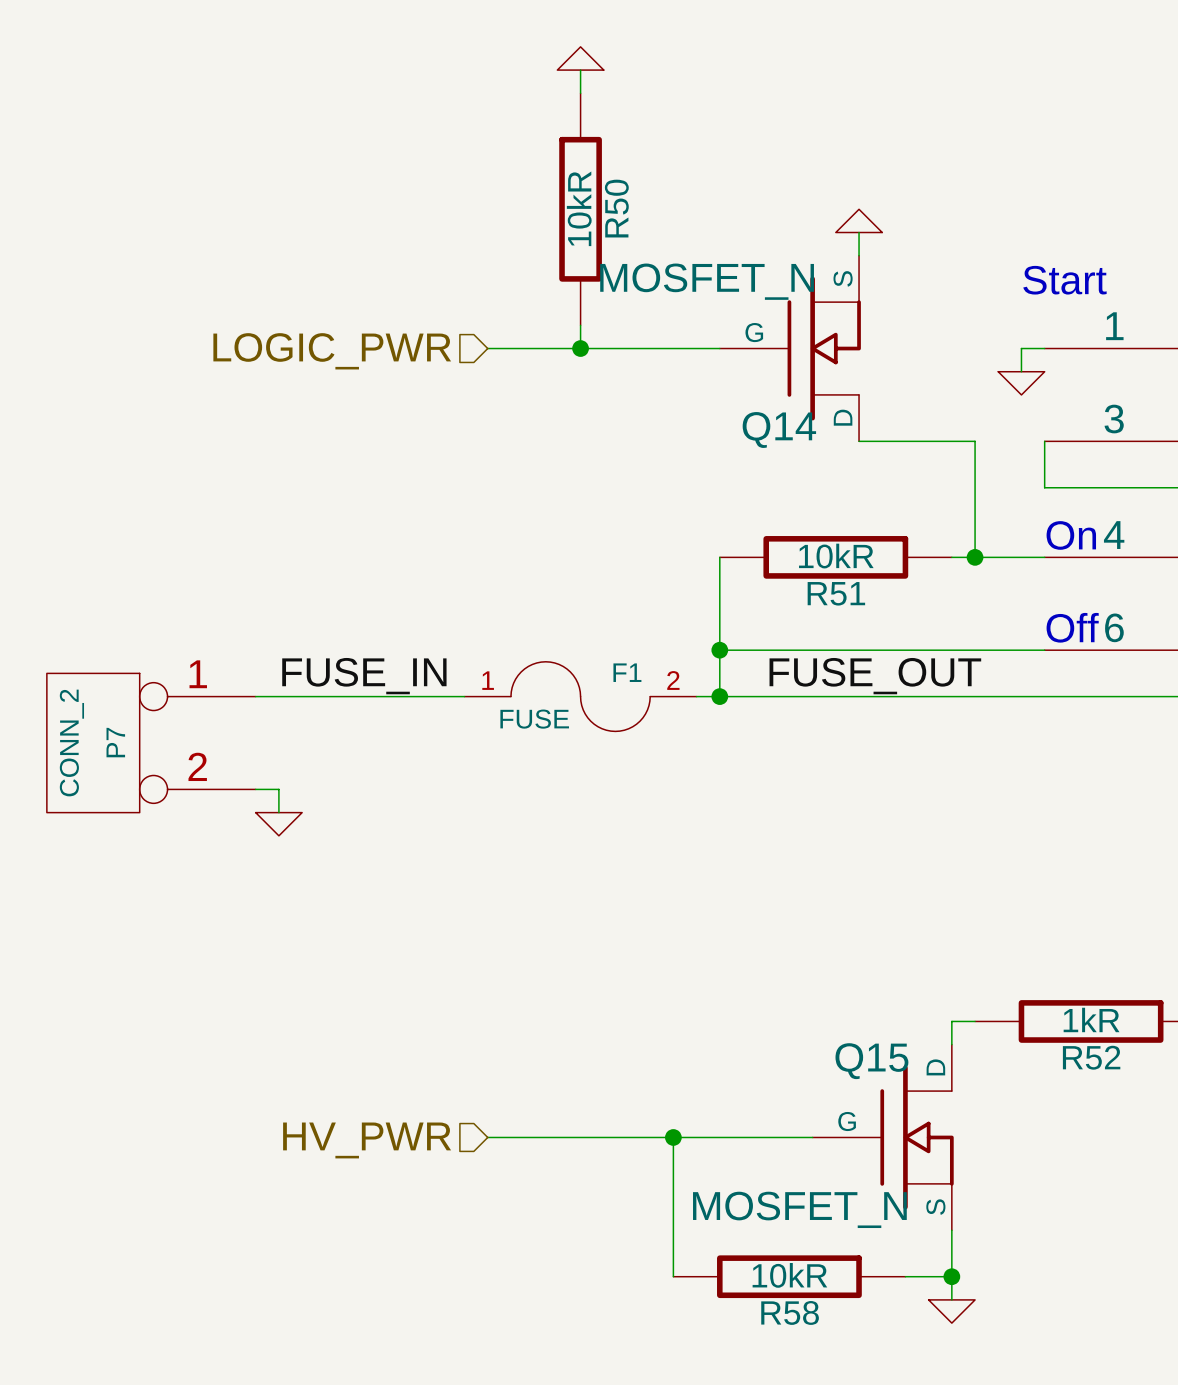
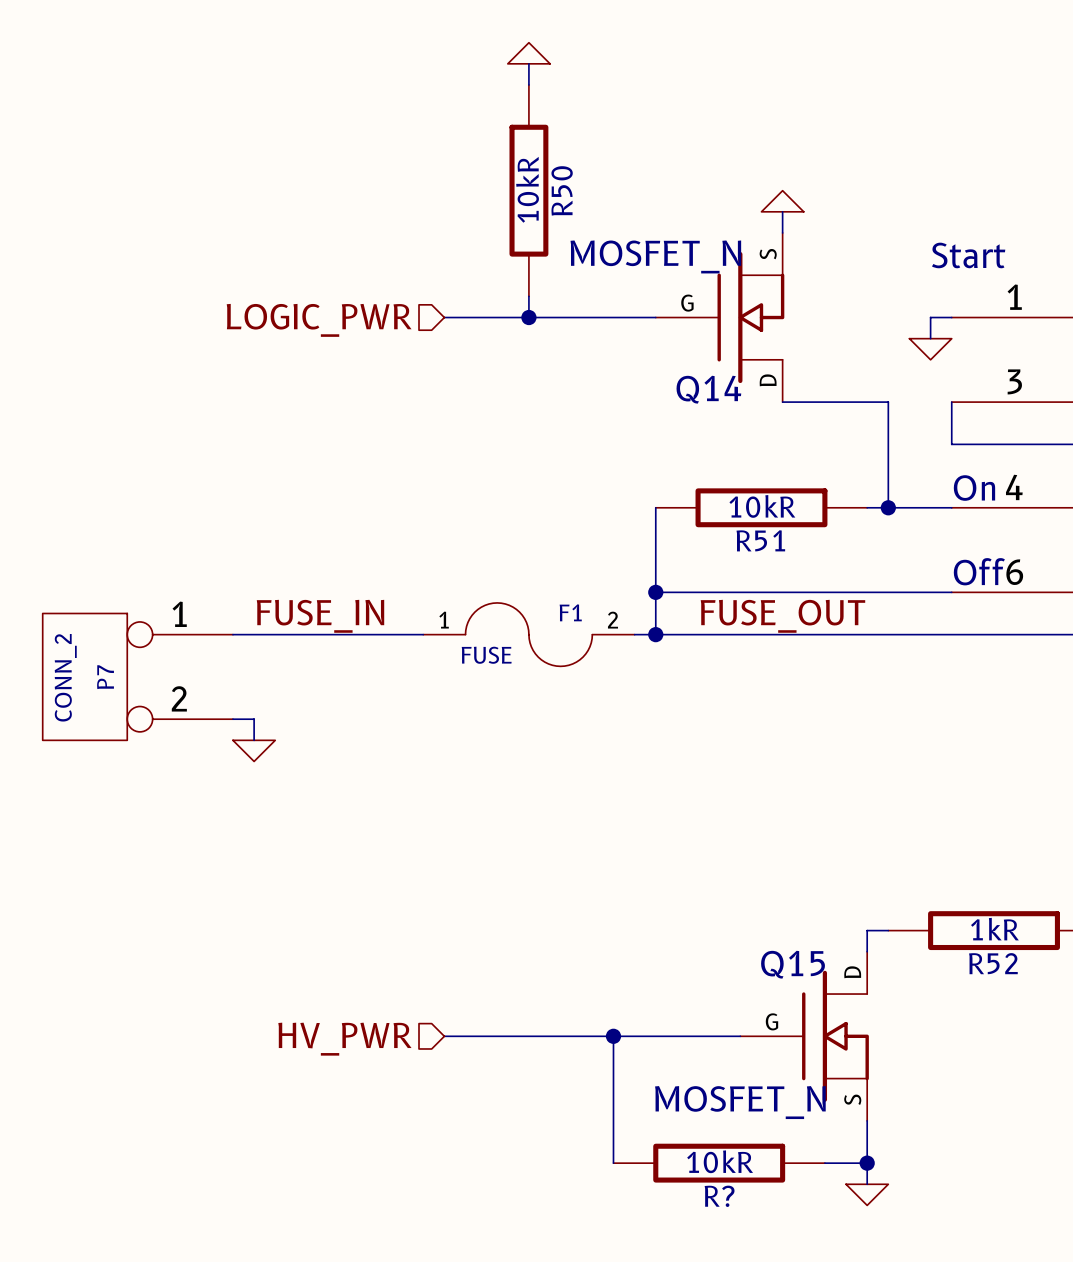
R58 name: R58 (790, 1312) -> R? (719, 1196)

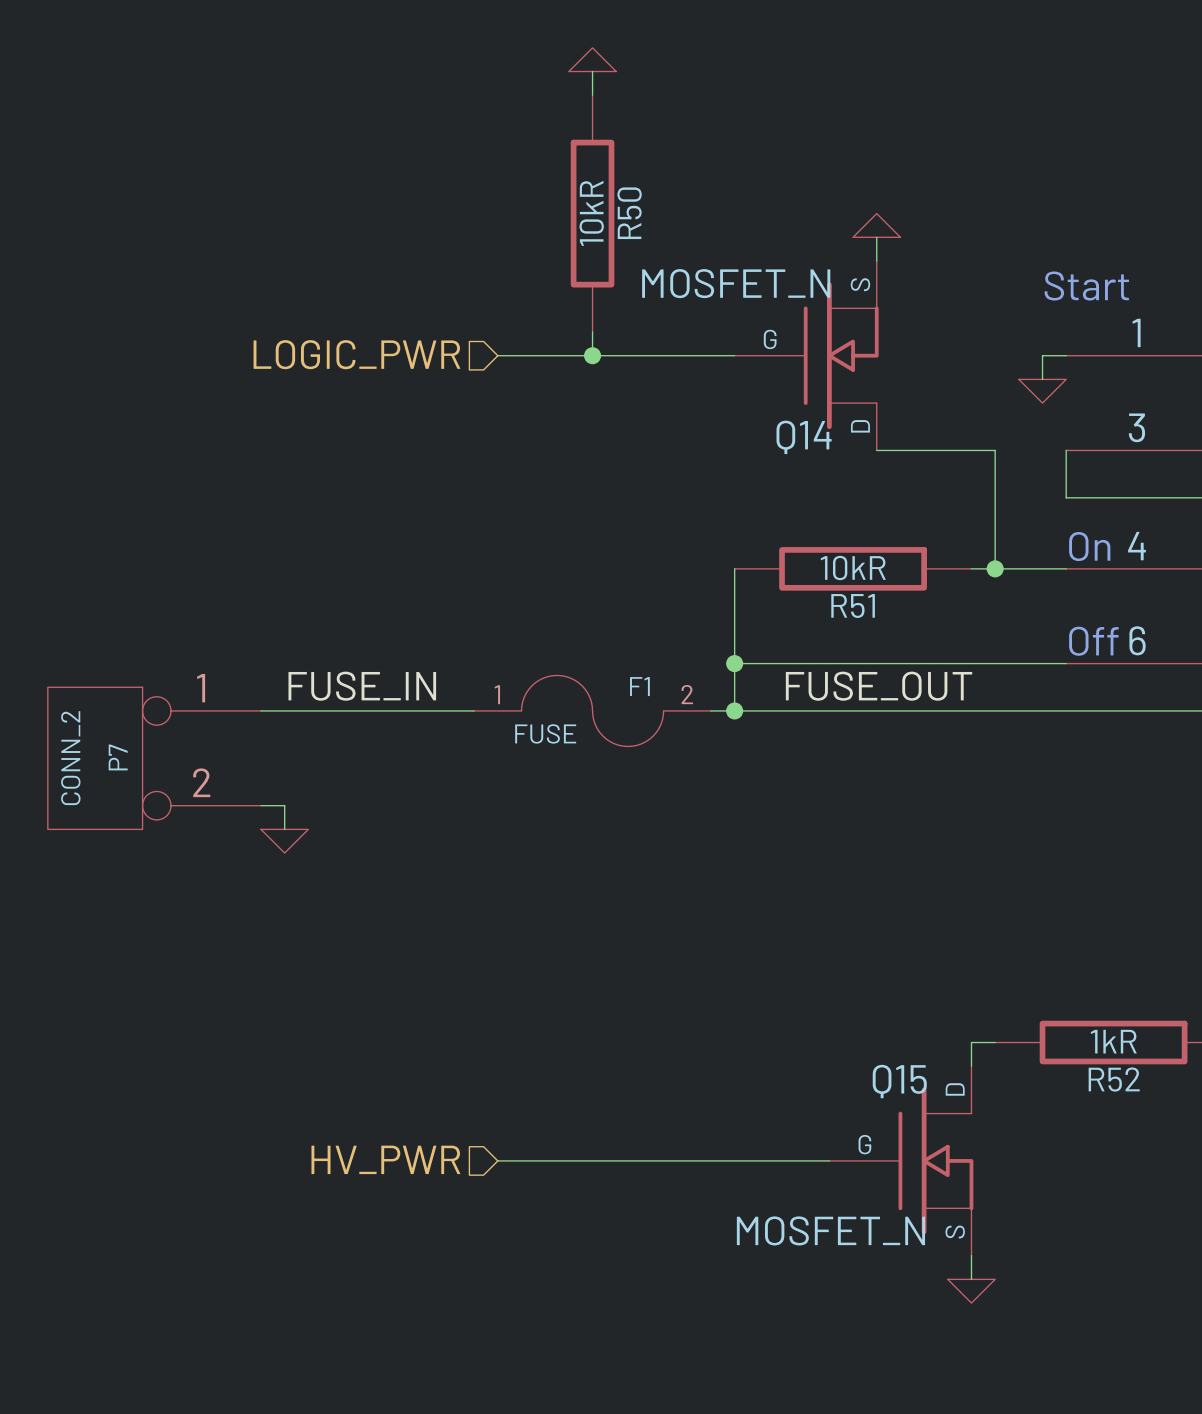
wire: (613, 1036) (613, 1163) -> none
junction: (613, 1036) -> none
wire: (867, 1142) (867, 1184) -> none
R?: 10kR (719, 1163) -> none
wire: (824, 1163) (867, 1163) -> none
junction: (867, 1163) -> none
power symbol position: (867, 1194) -> (971, 1291)

